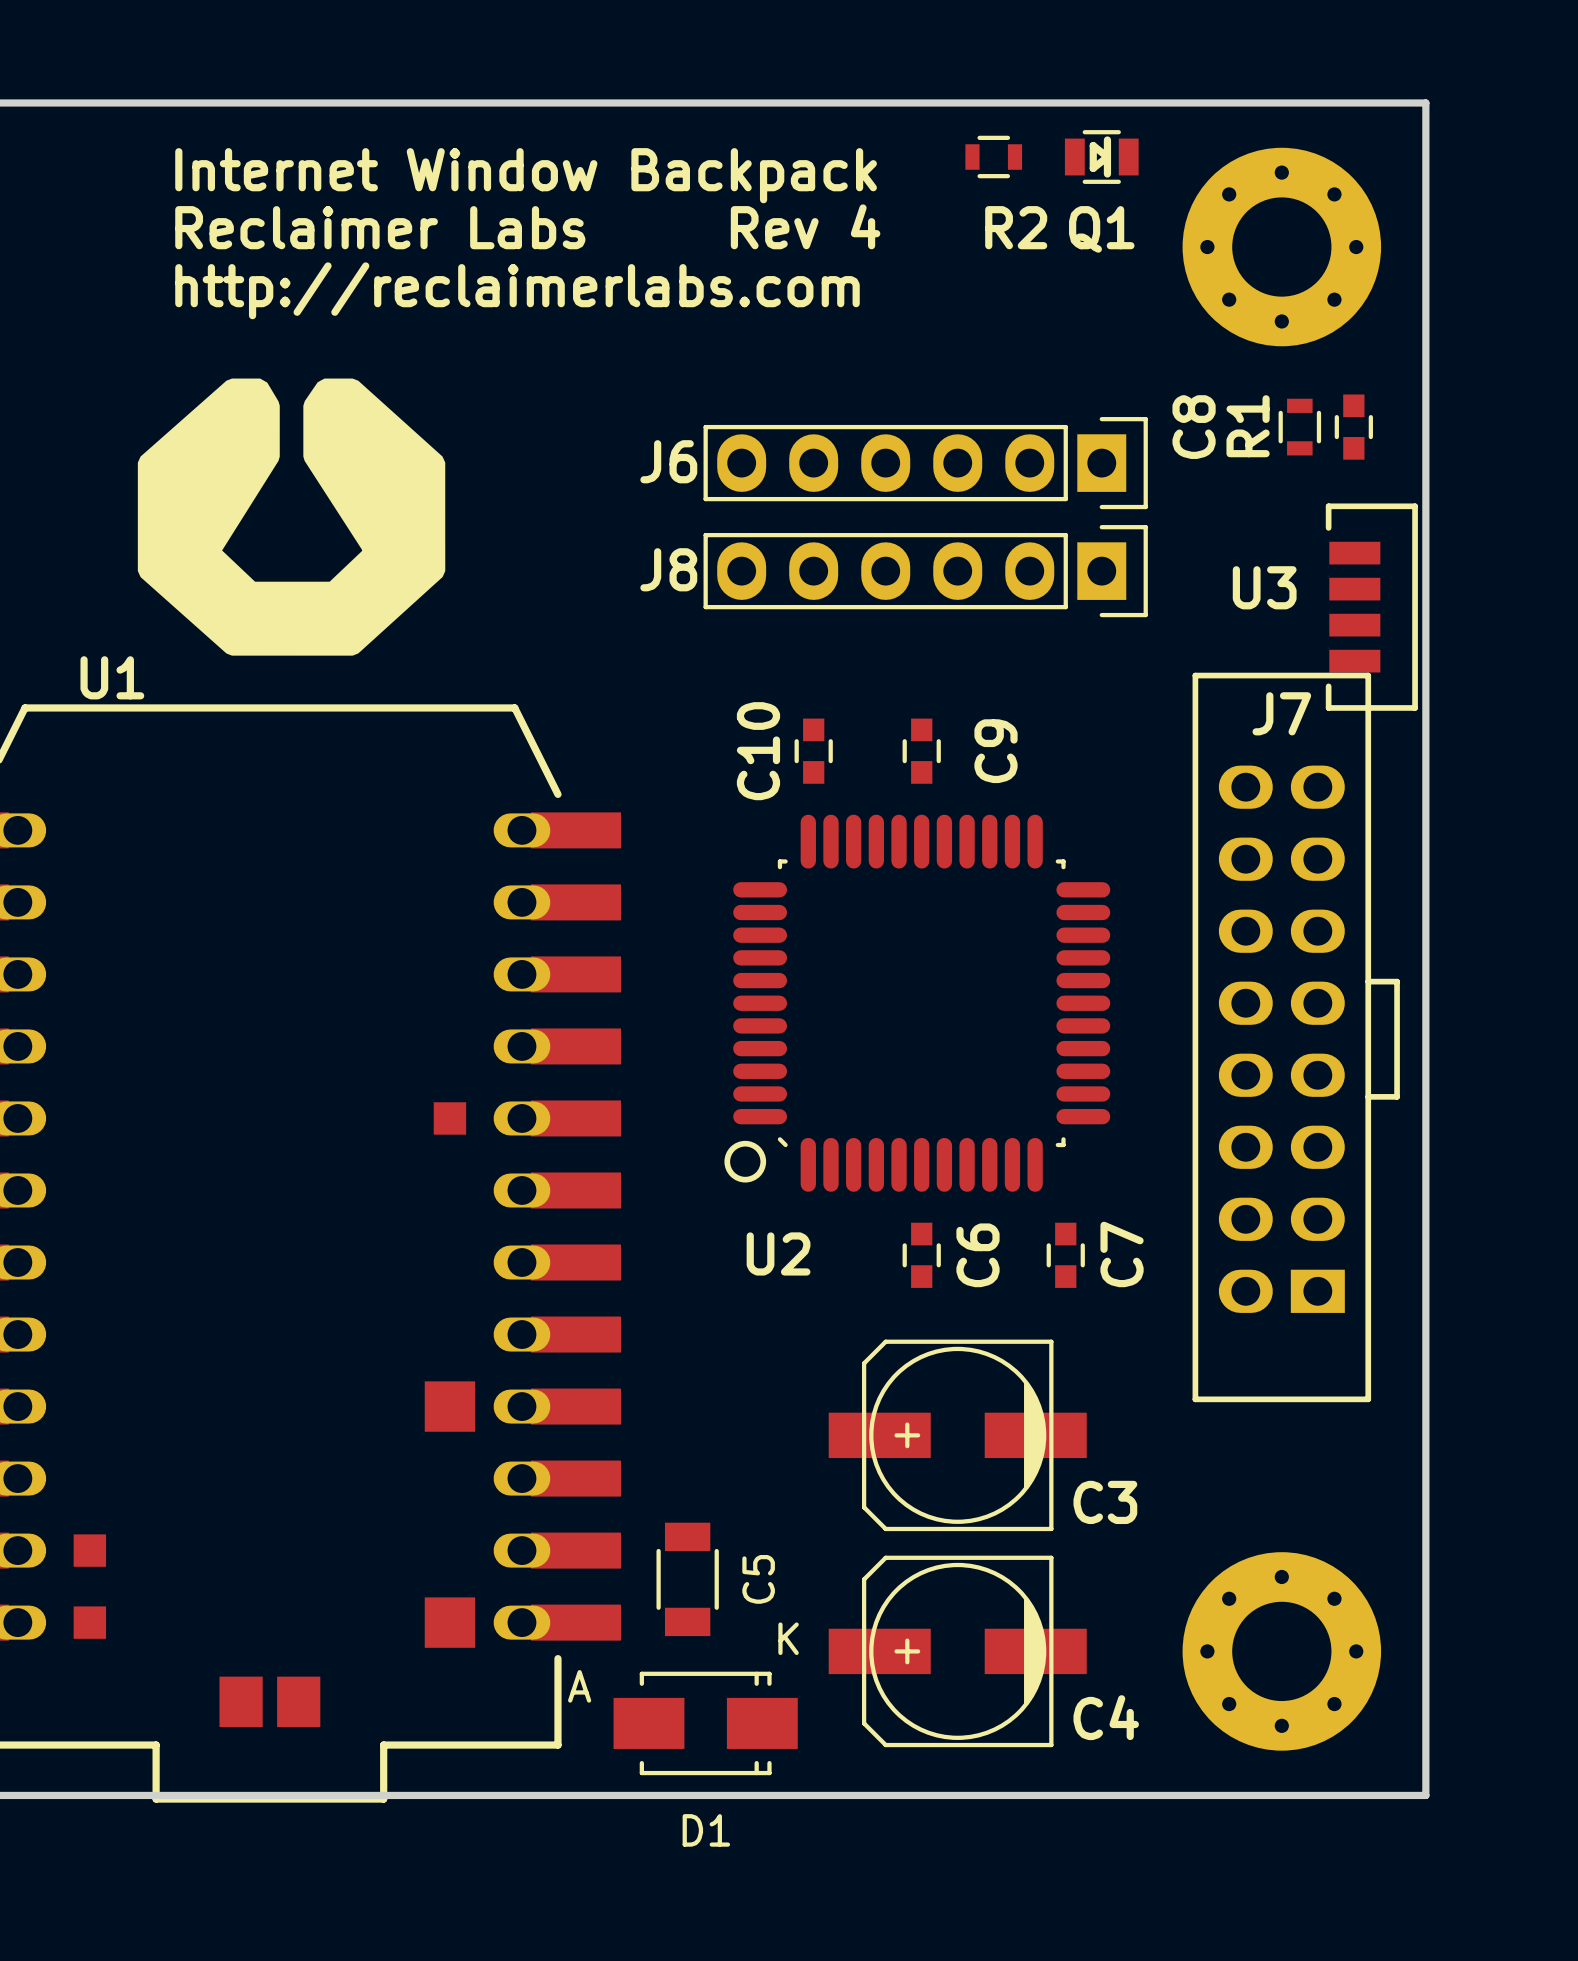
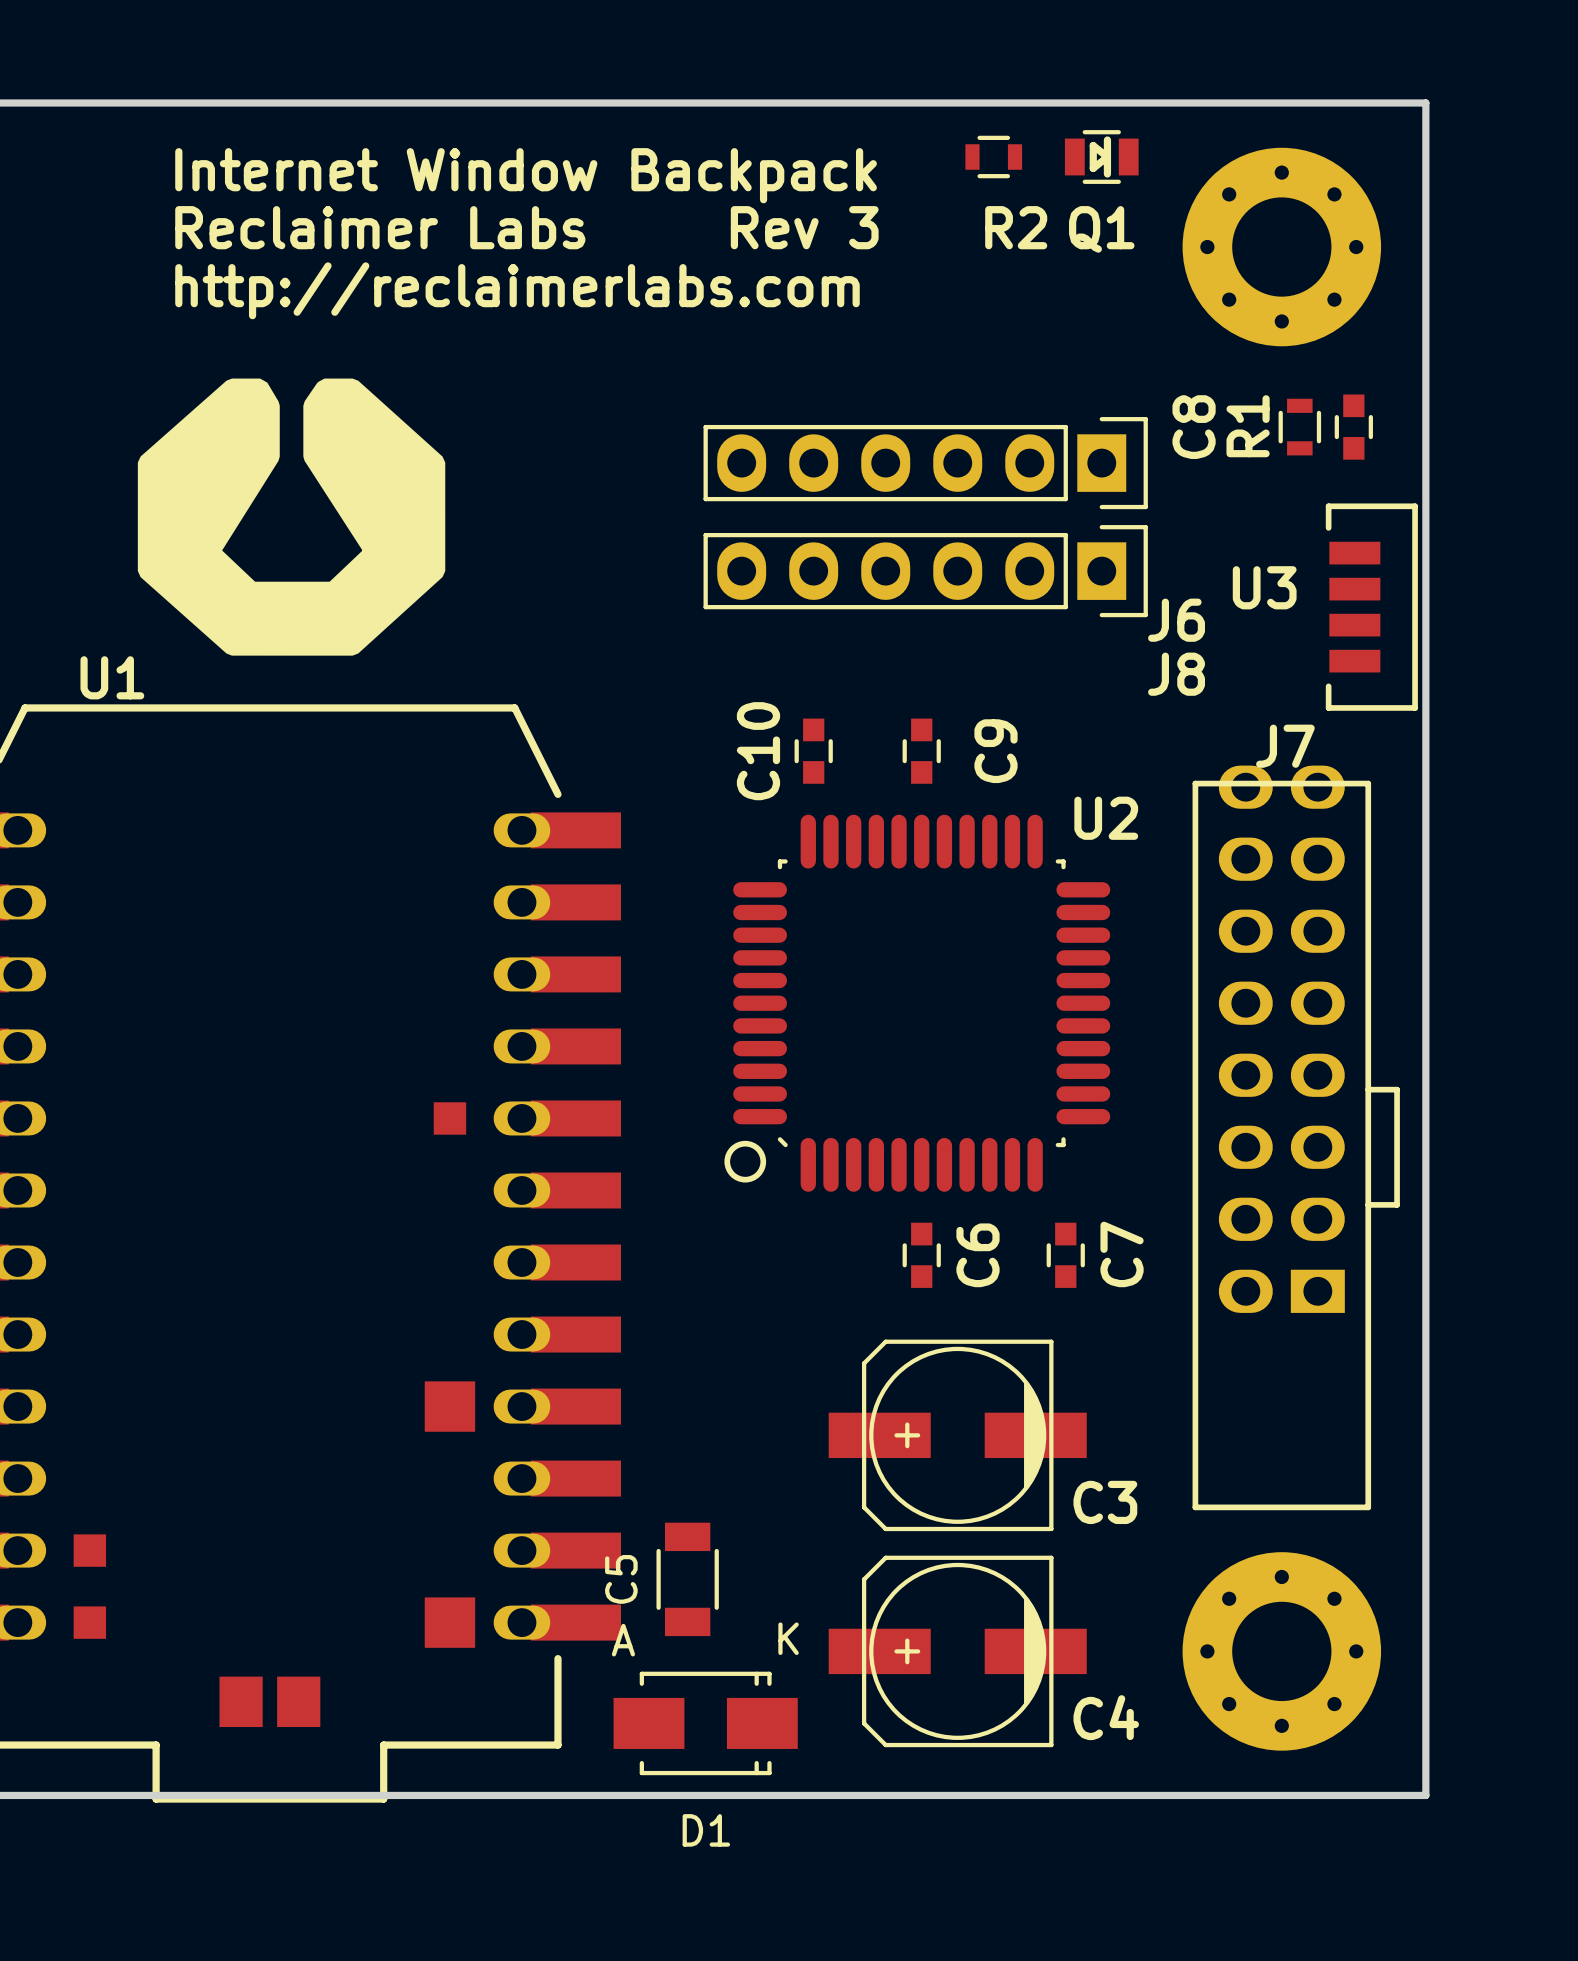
text: Reclaimer Labs Rev 4 (527, 226) -> Reclaimer Labs Rev 3 (526, 227)
J6 name position: J6 (668, 461) -> J6 (1176, 620)
J8 name position: J8 (668, 569) -> J8 (1176, 674)
text position: J7 (1281, 713) -> J7 (1285, 746)
line: (1195, 783) (1195, 675) (1368, 675) (1368, 783) -> (1195, 783) (1368, 783)
line: (1368, 981) (1397, 981) (1397, 1089) -> (1368, 1089) (1397, 1089)
line: (1368, 1096) (1397, 1096) -> (1368, 1204) (1397, 1204) (1397, 1096)
U2 name position: U2 (778, 1253) -> U2 (1106, 818)
line: (1195, 1399) (1368, 1399) -> (1195, 1399) (1195, 1507) (1368, 1507) (1368, 1399)
C5 name position: C5 (758, 1579) -> C5 (621, 1579)
D1 text position: A (579, 1686) -> A (623, 1640)

